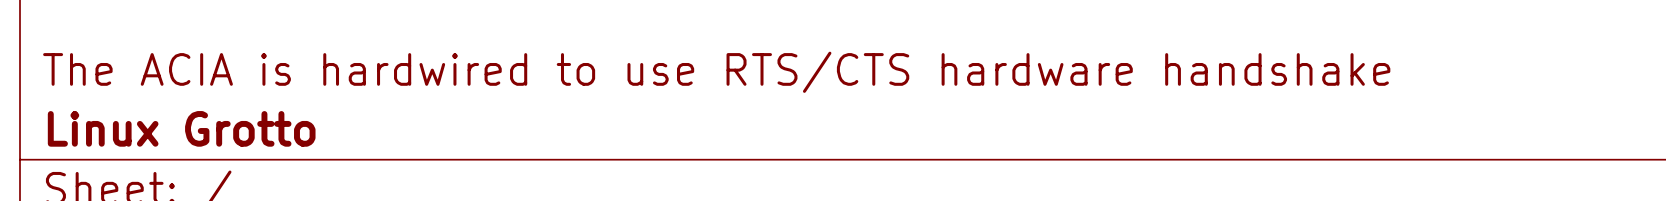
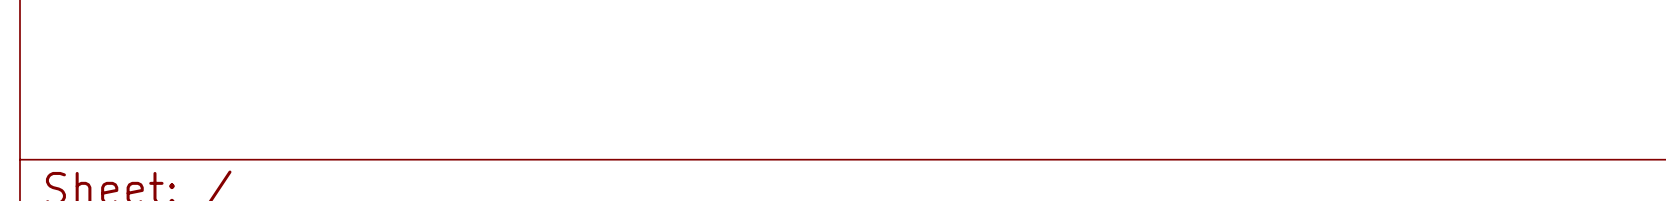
title block: The ACIA is hardwired to use RTS/CTS hardware handshake (716, 72) -> none
title block: Linux Grotto (181, 128) -> none

